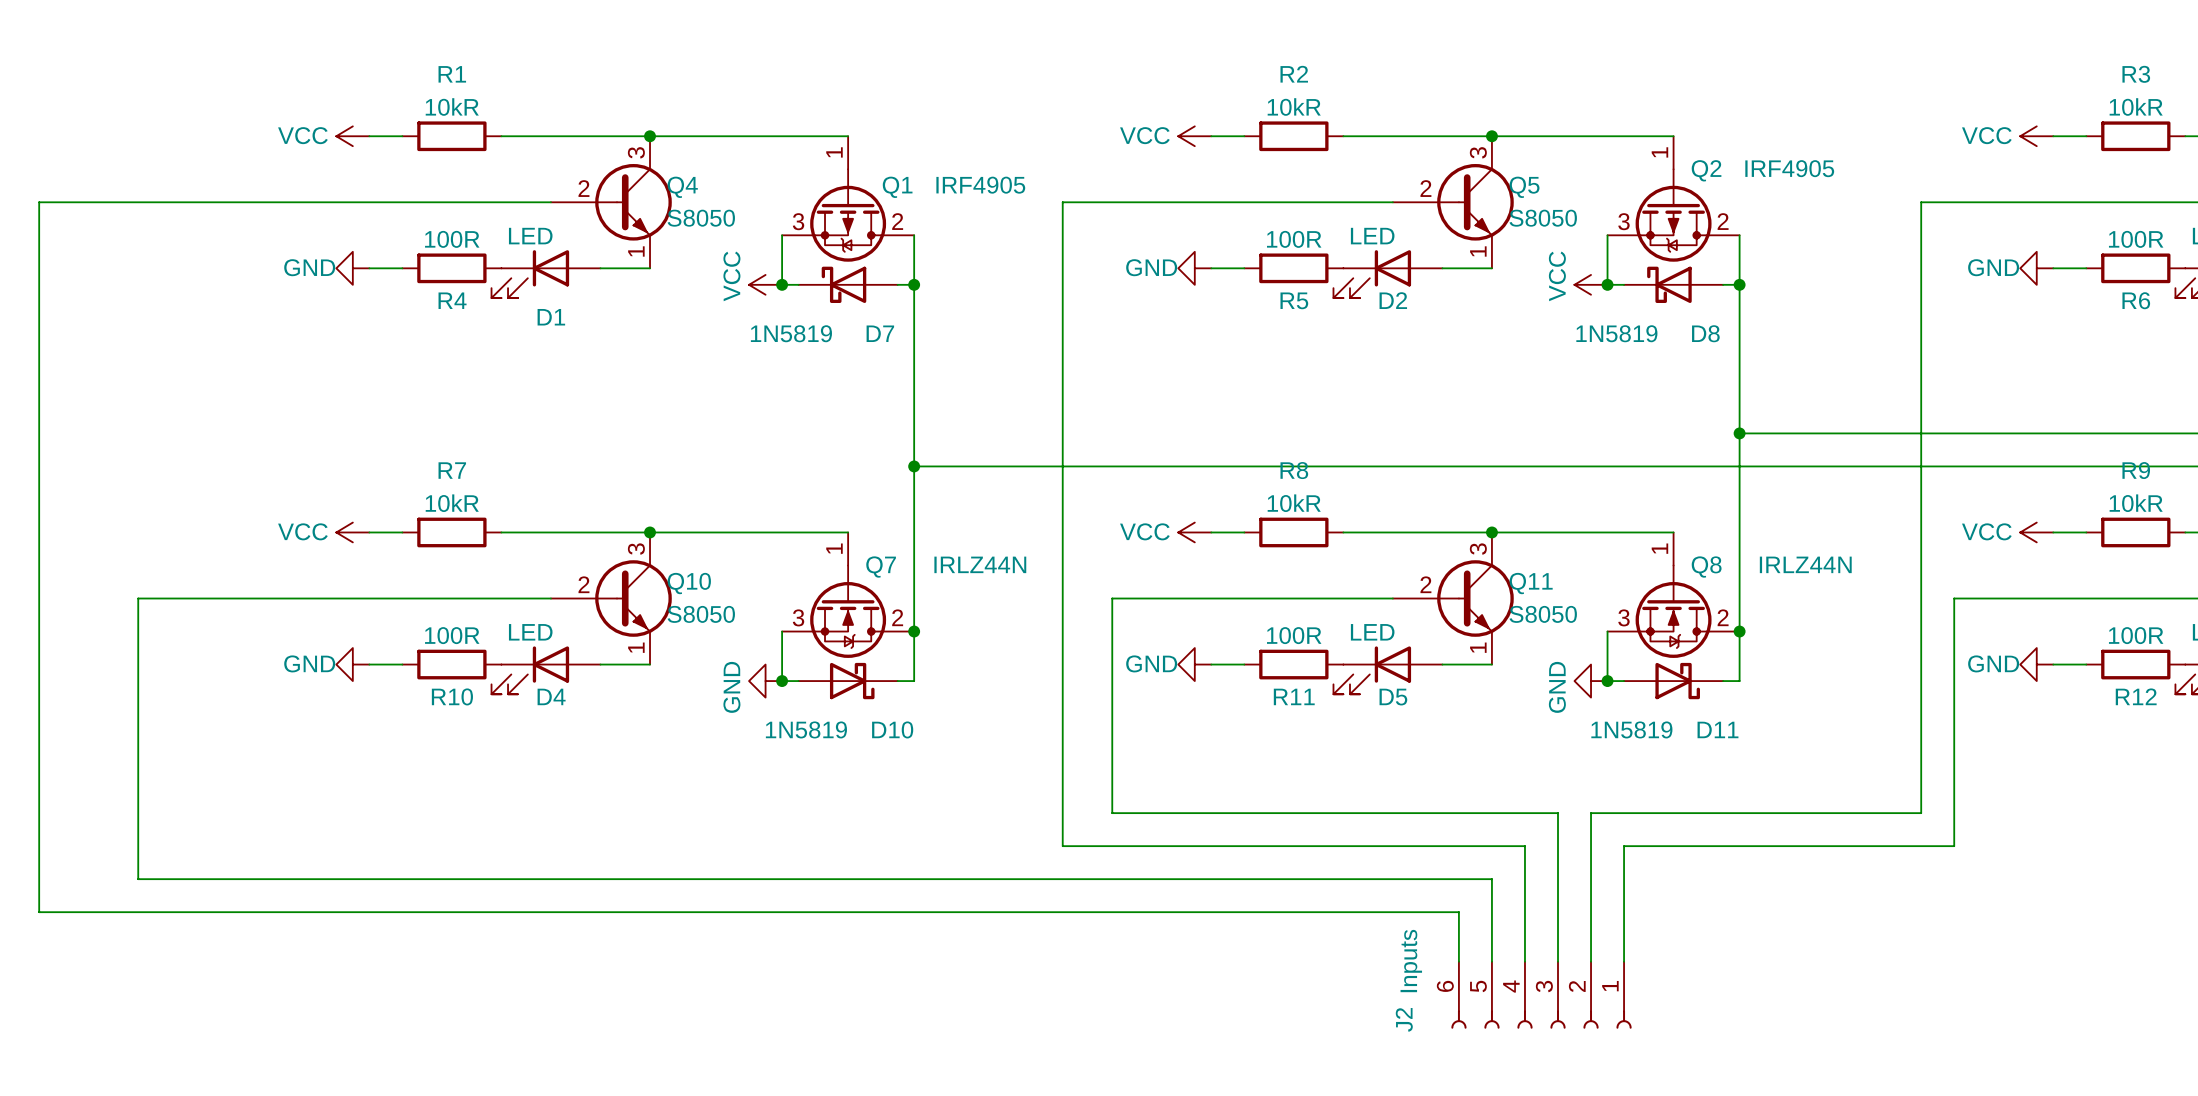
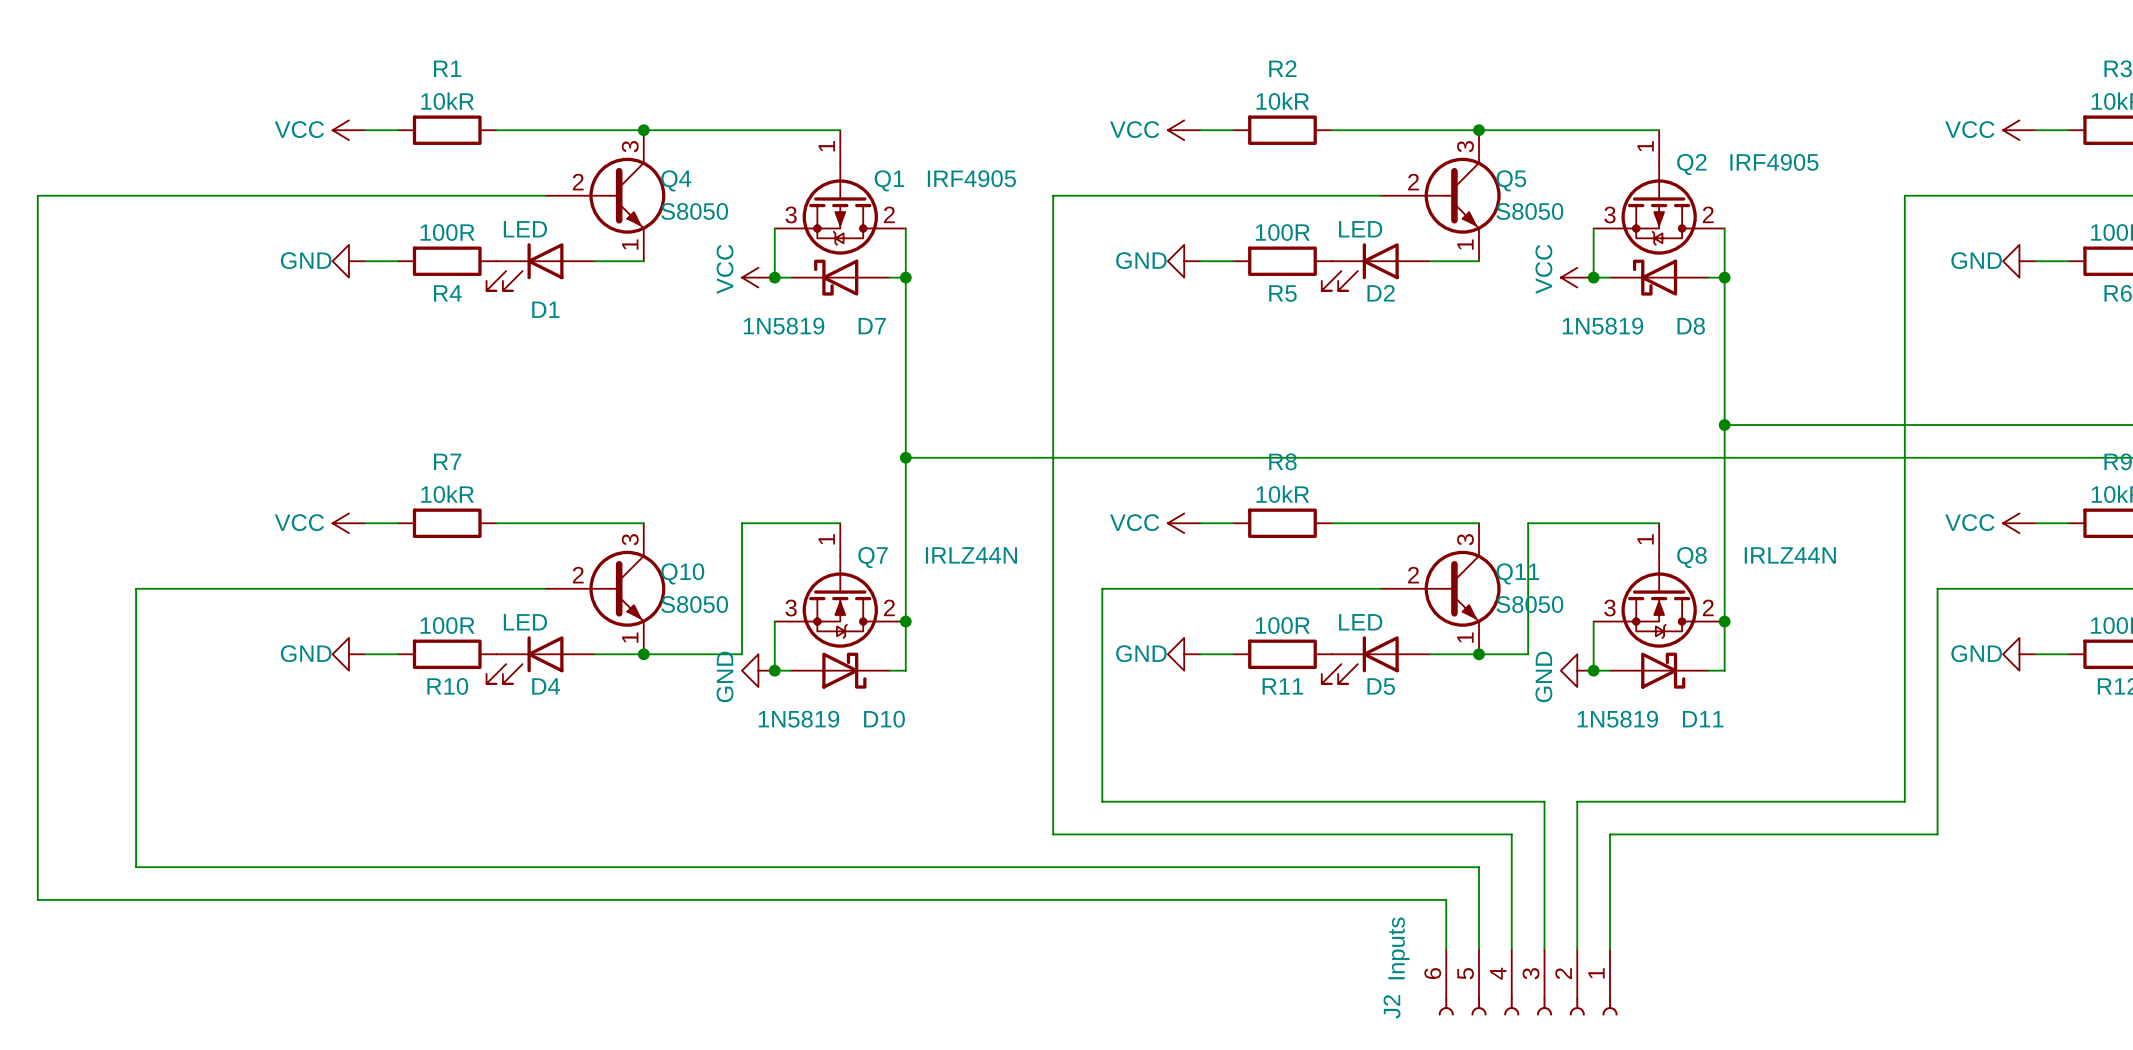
wire: (650, 532) (749, 532) -> (643, 654) (742, 654) (742, 523)
junction: (650, 532) -> none
wire: (1491, 532) (1541, 532) -> (1479, 654) (1528, 654) (1528, 523)
junction: (1491, 532) -> none
junction: none -> (643, 654)
junction: none -> (1479, 654)

